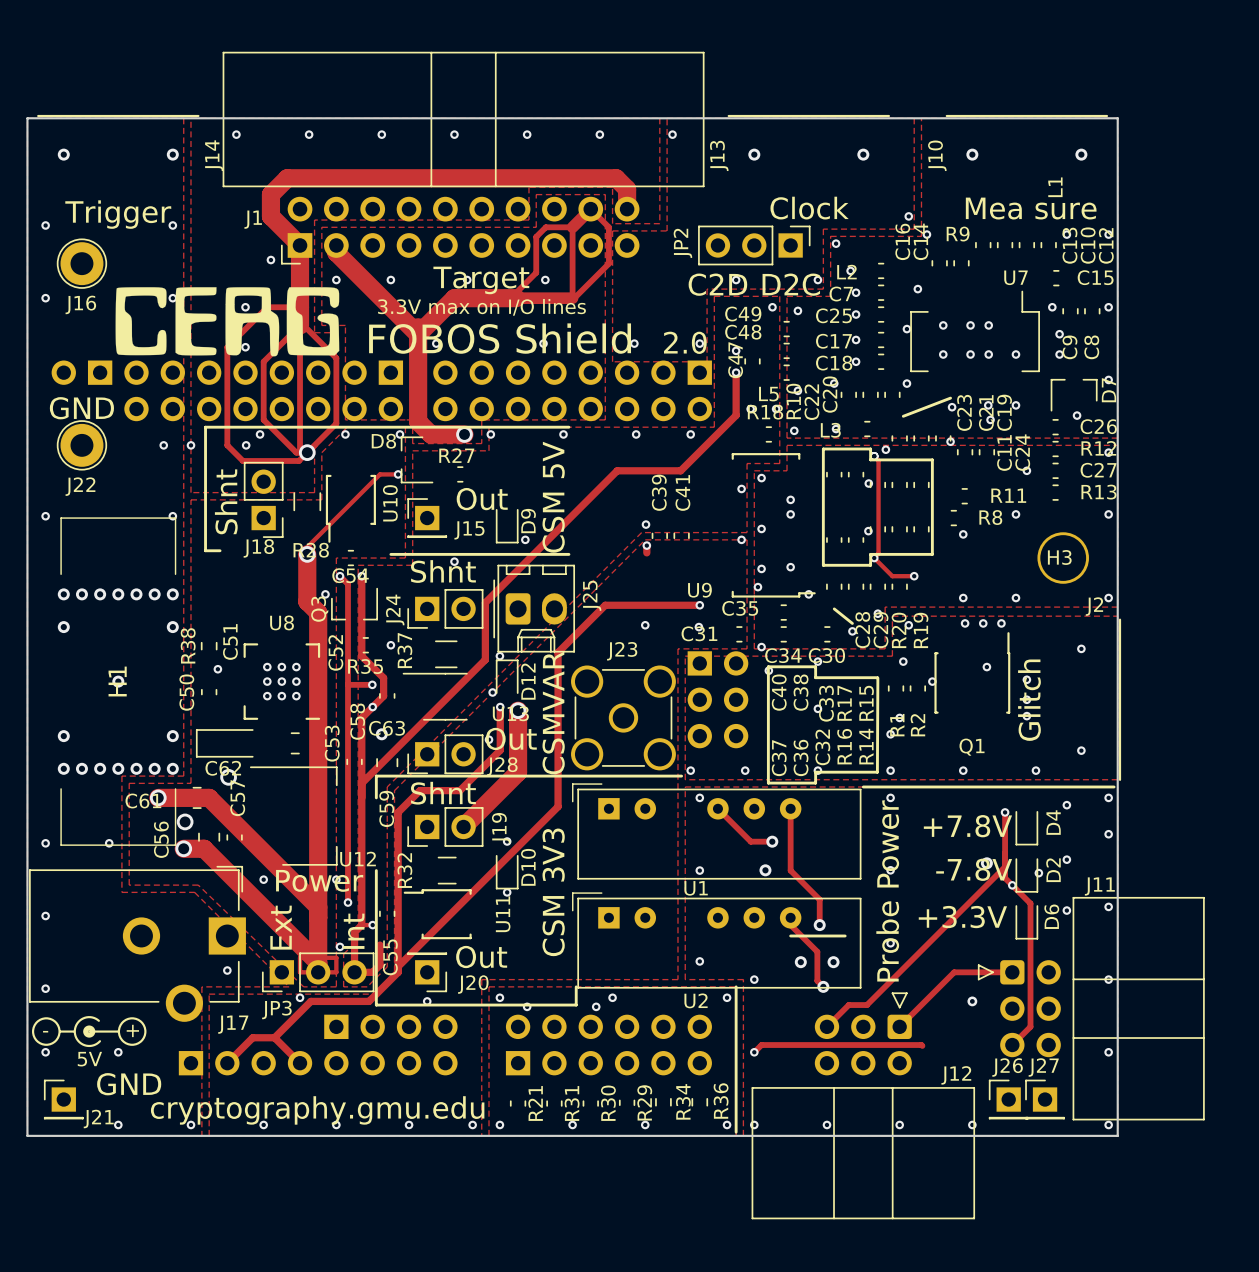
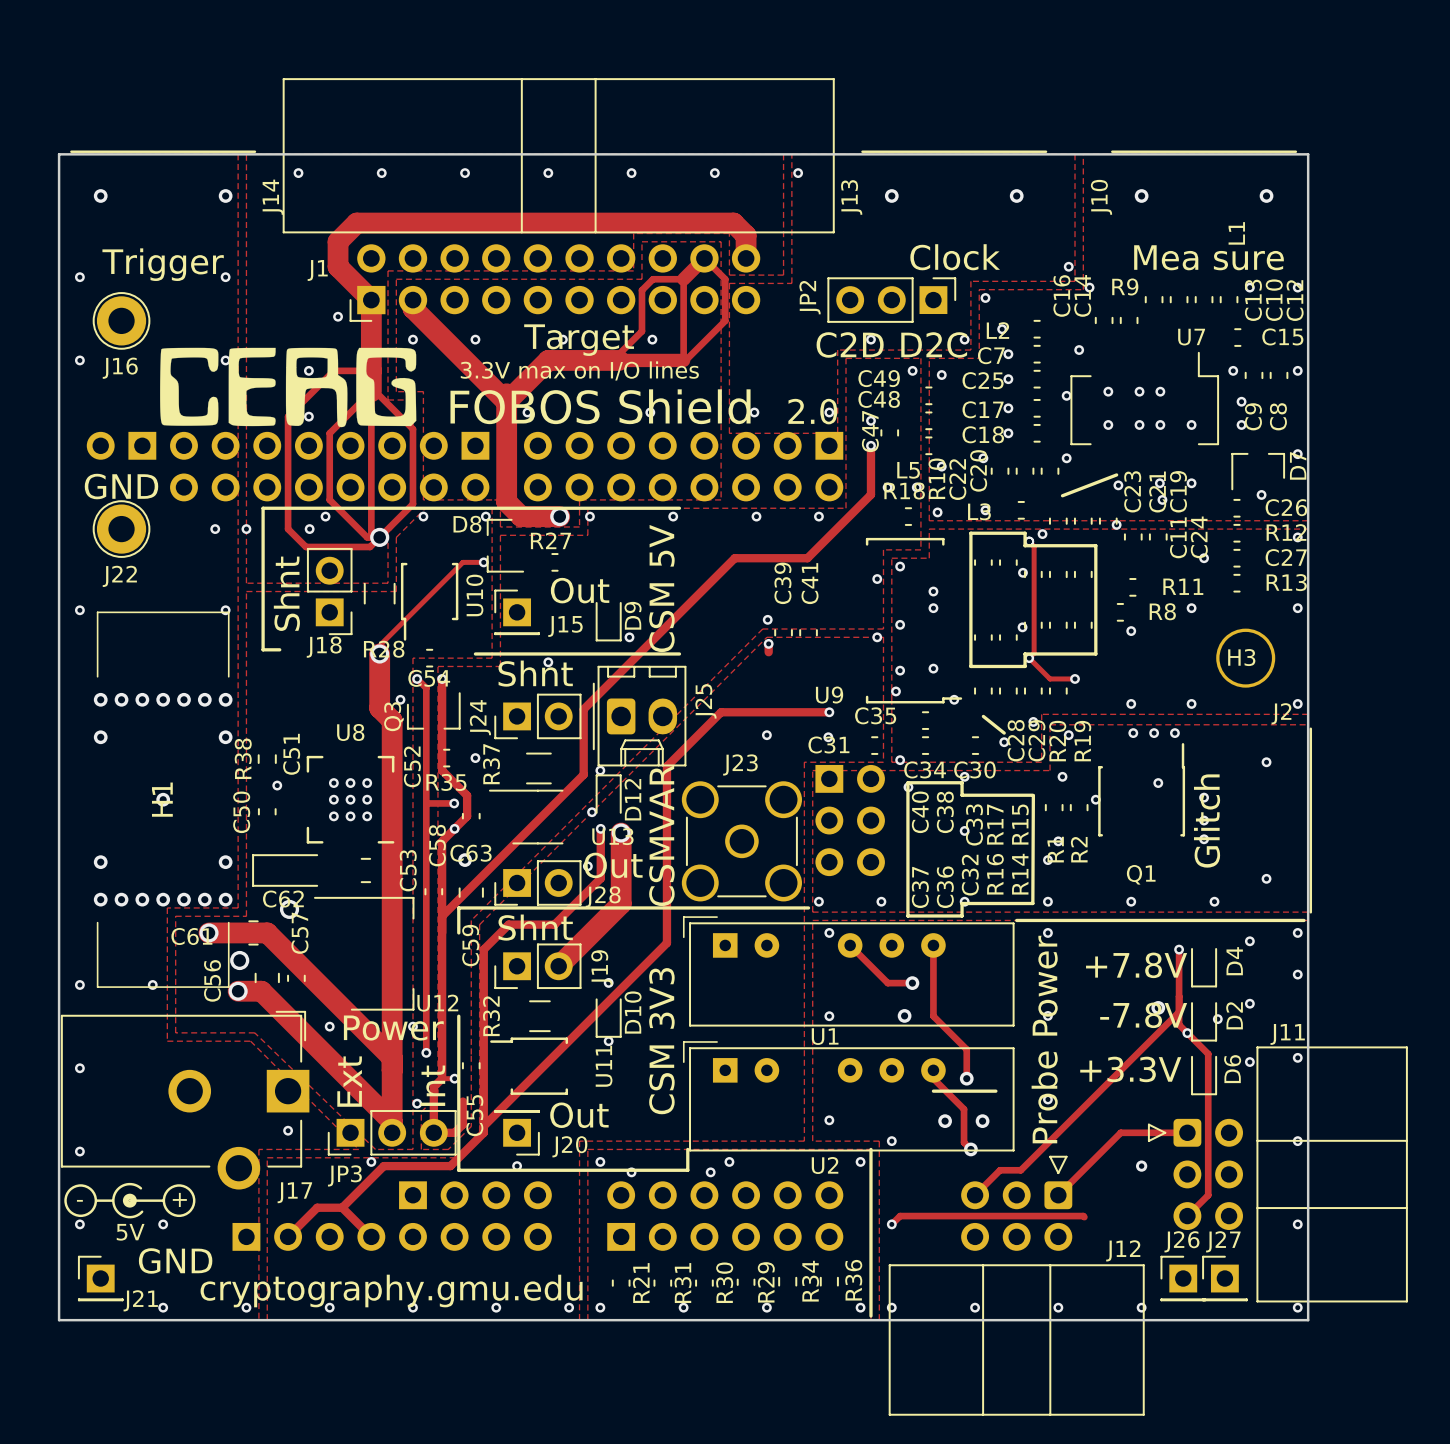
track: (300, 957) (300, 972) (336, 972) (336, 957) (300, 957) -> none

